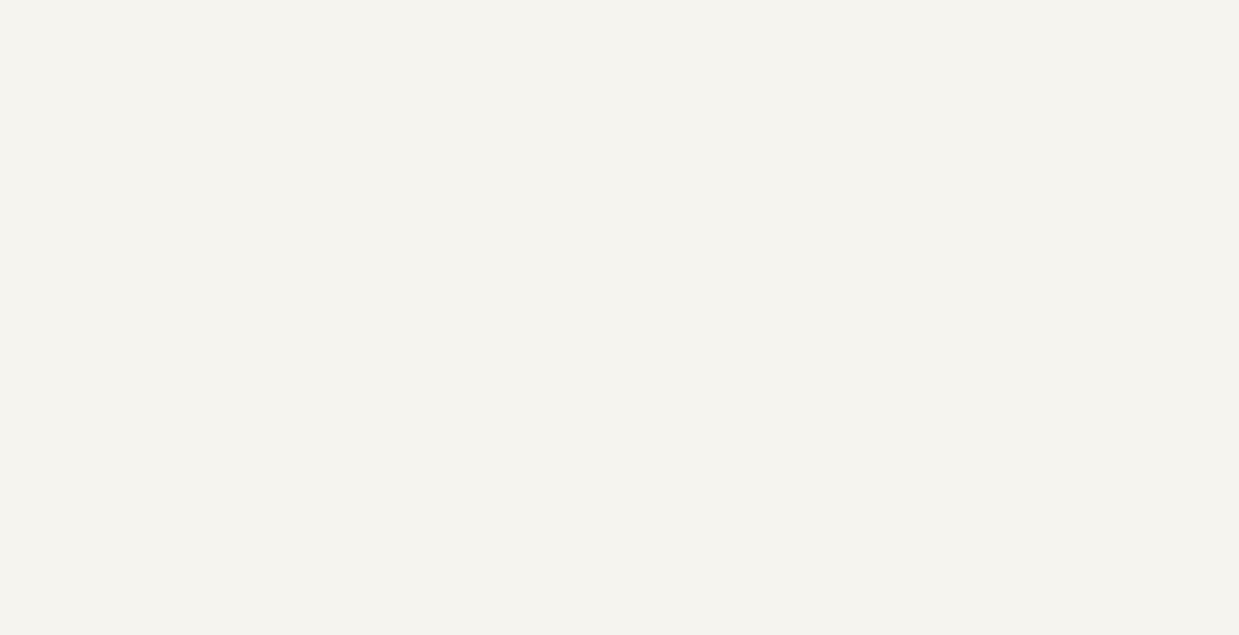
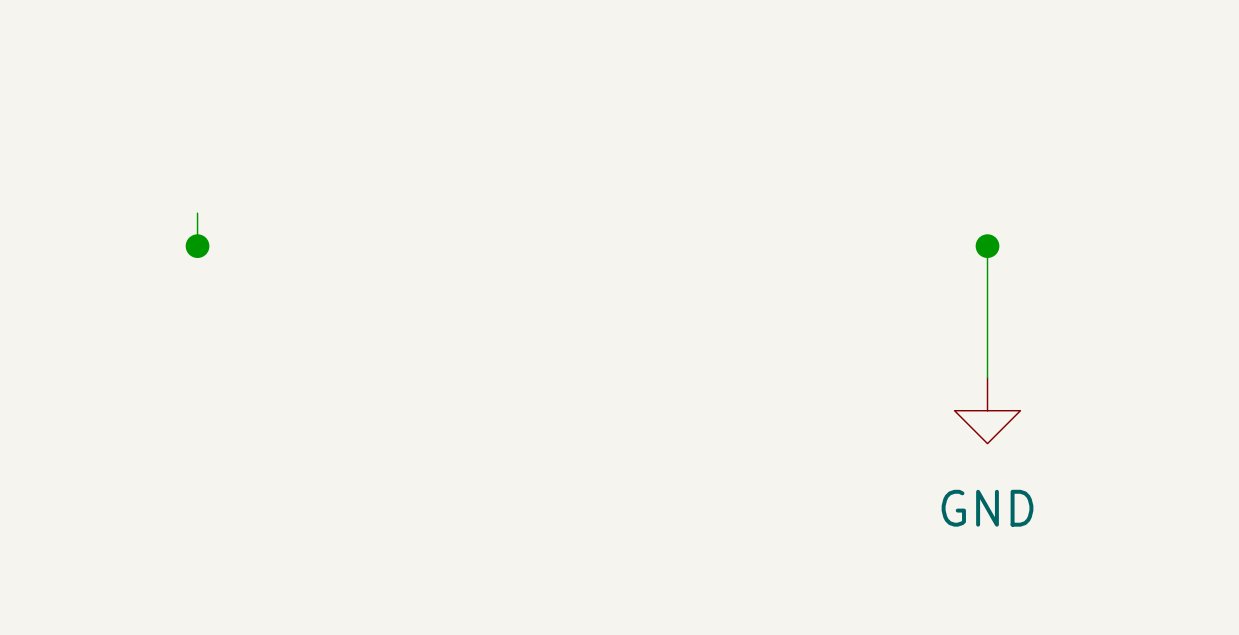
wire: none -> (197, 213) (197, 246)
junction: none -> (197, 246)
wire: none -> (987, 246) (987, 377)
junction: none -> (987, 246)
power symbol: none -> GND (987, 410)

